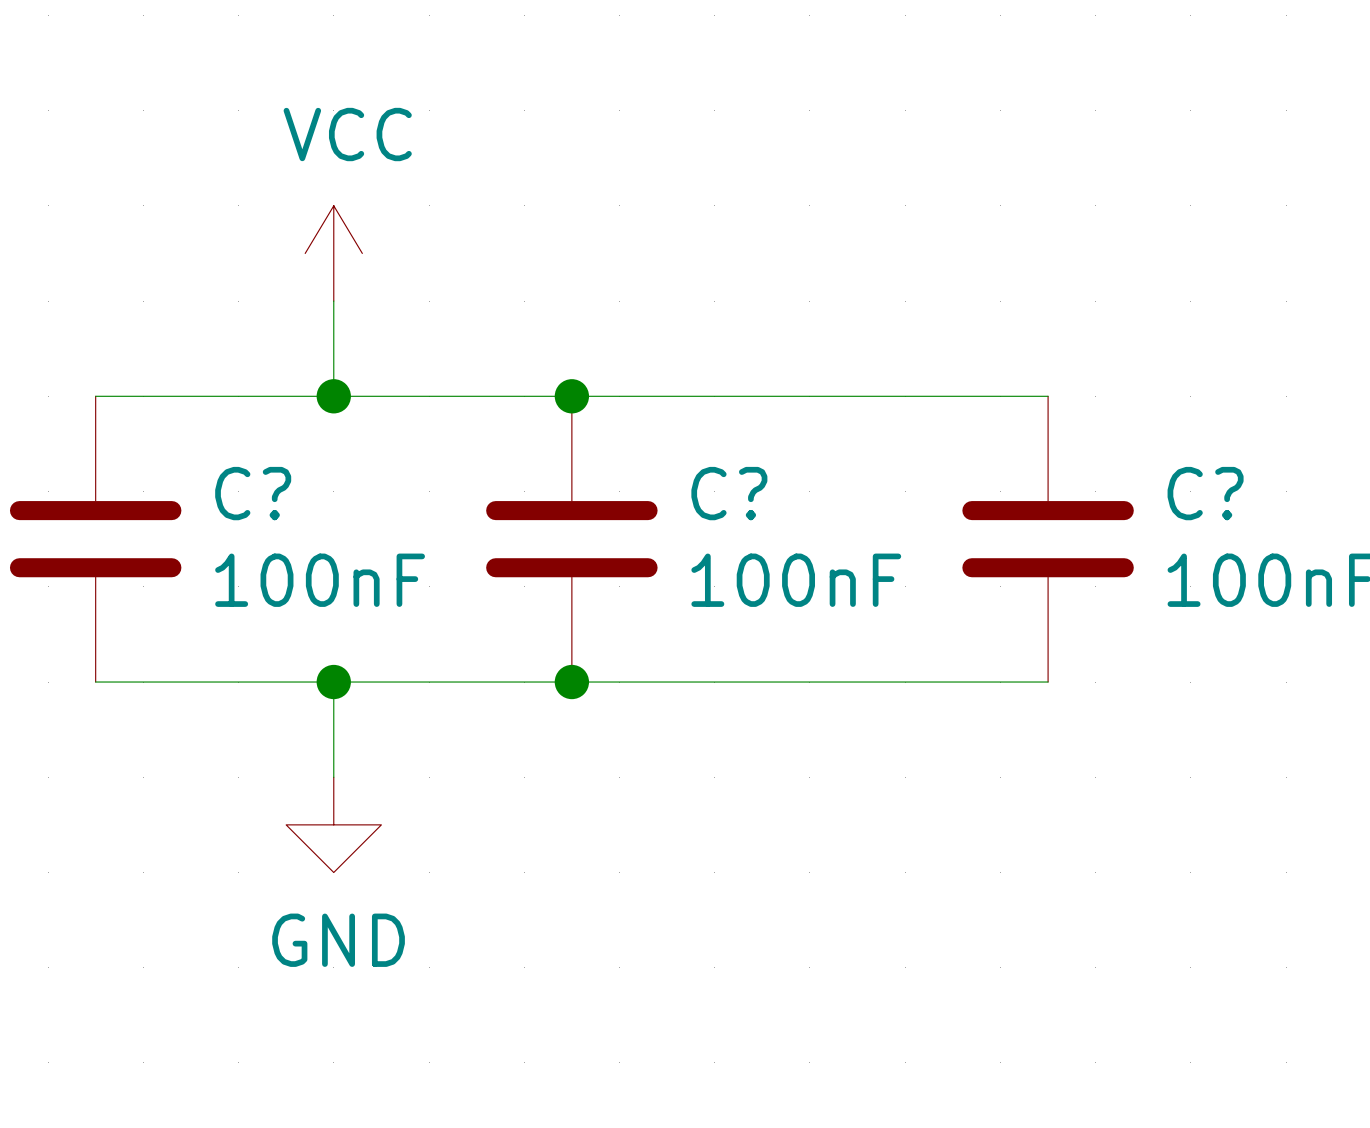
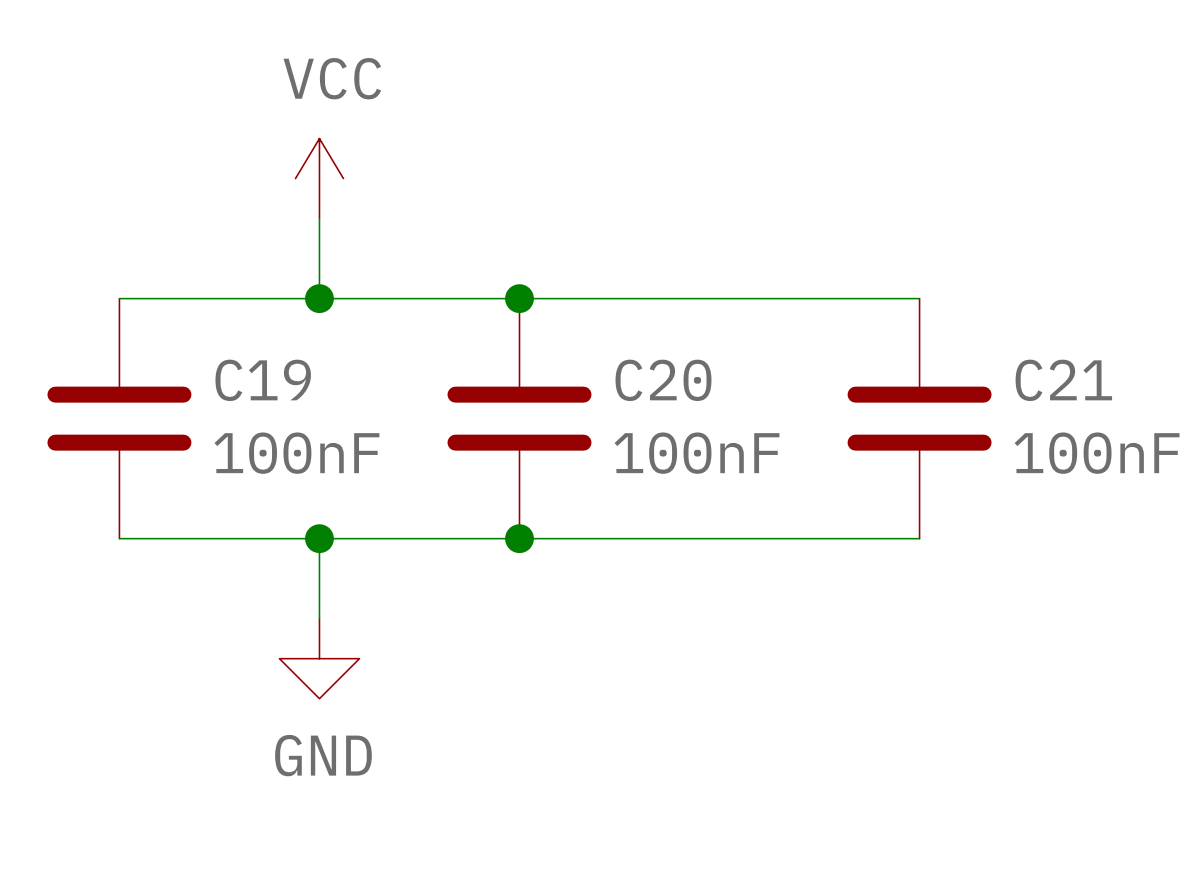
C? name: C? (253, 493) -> C19 (263, 380)
C? name: C? (729, 493) -> C20 (663, 380)
C? name: C? (1205, 493) -> C21 (1063, 380)

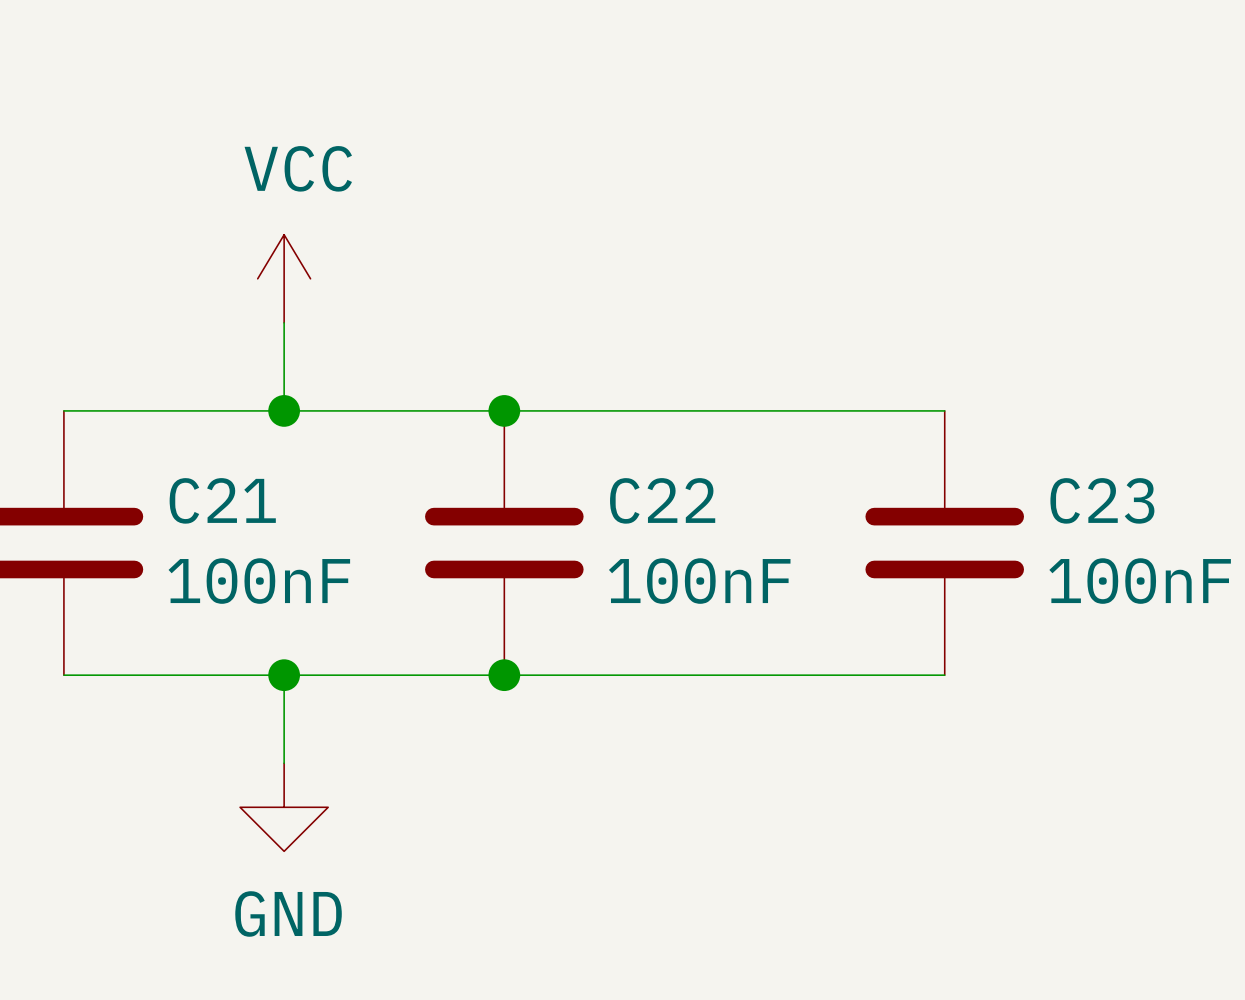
C19 name: C19 (263, 380) -> C21 (222, 500)
C20 name: C20 (663, 380) -> C22 (662, 500)
C21 name: C21 (1063, 380) -> C23 (1102, 500)

